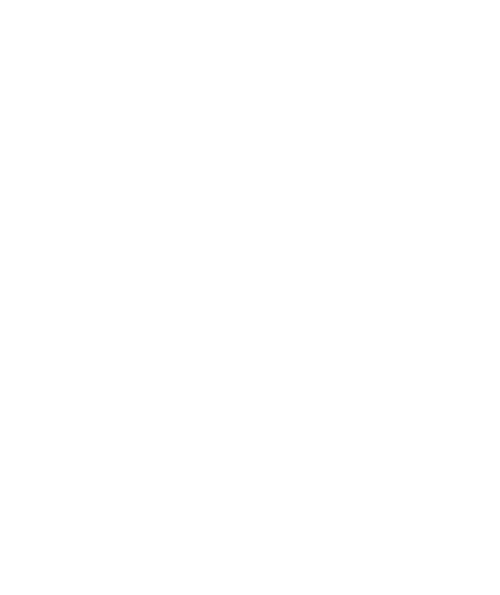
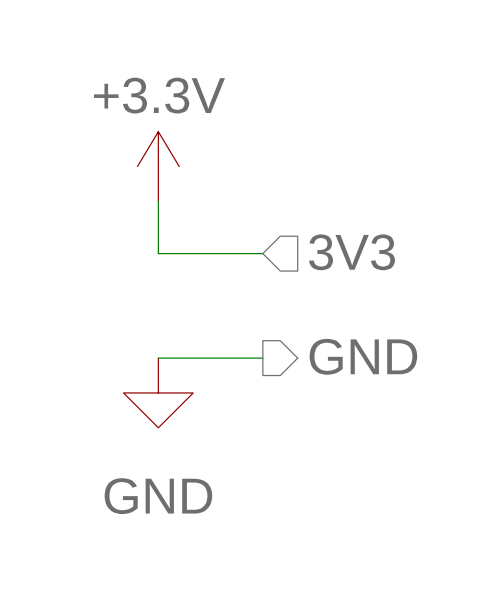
power symbol: none -> +3.3V (158, 166)
wire: none -> (158, 201) (158, 253) (262, 253)
hierarchical label: none -> 3V3 (351, 252)
hierarchical label: none -> GND (363, 356)
wire: none -> (158, 358) (262, 358)
power symbol: none -> GND (158, 392)

